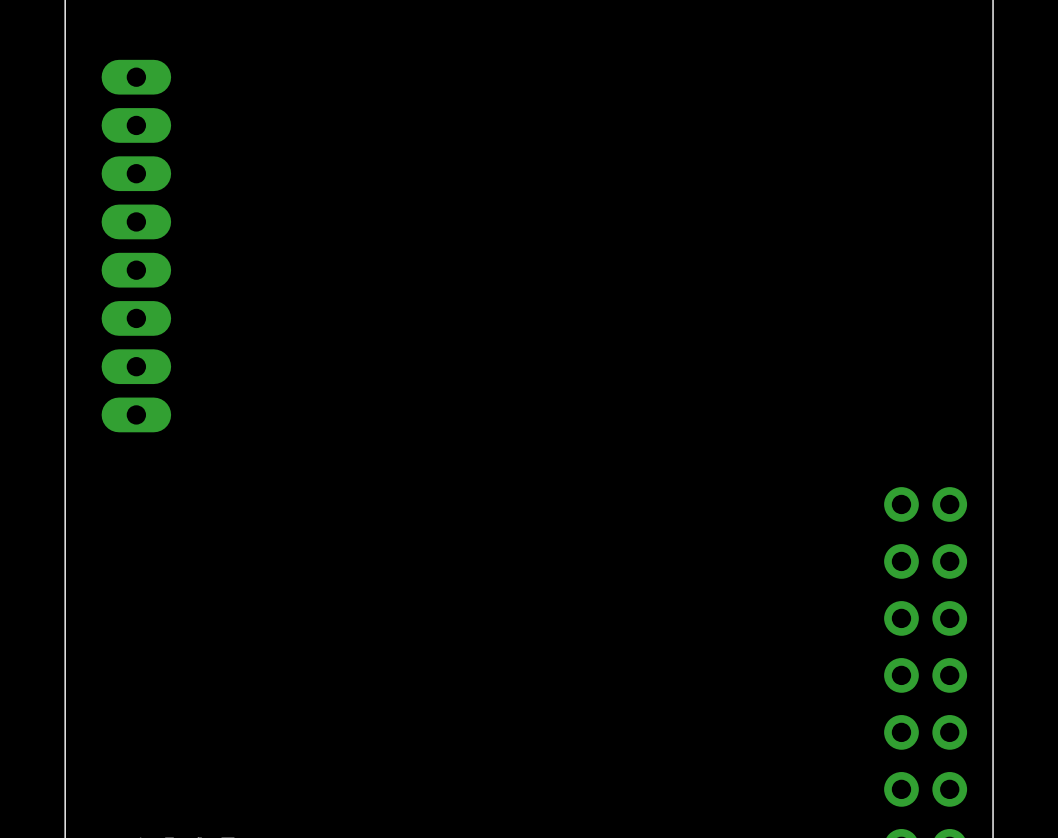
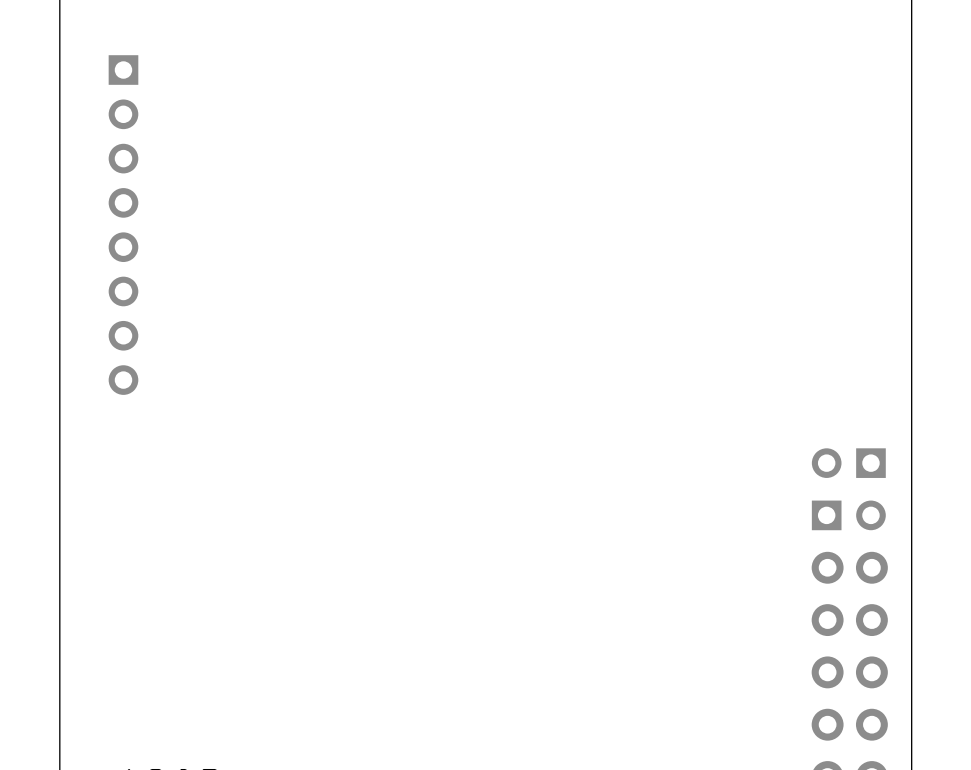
part footprint: [101, 59, 172, 433] -> [108, 55, 139, 395]
part footprint: [884, 487, 968, 522] -> [811, 448, 886, 478]
part footprint: [884, 544, 968, 579] -> [811, 500, 886, 531]

